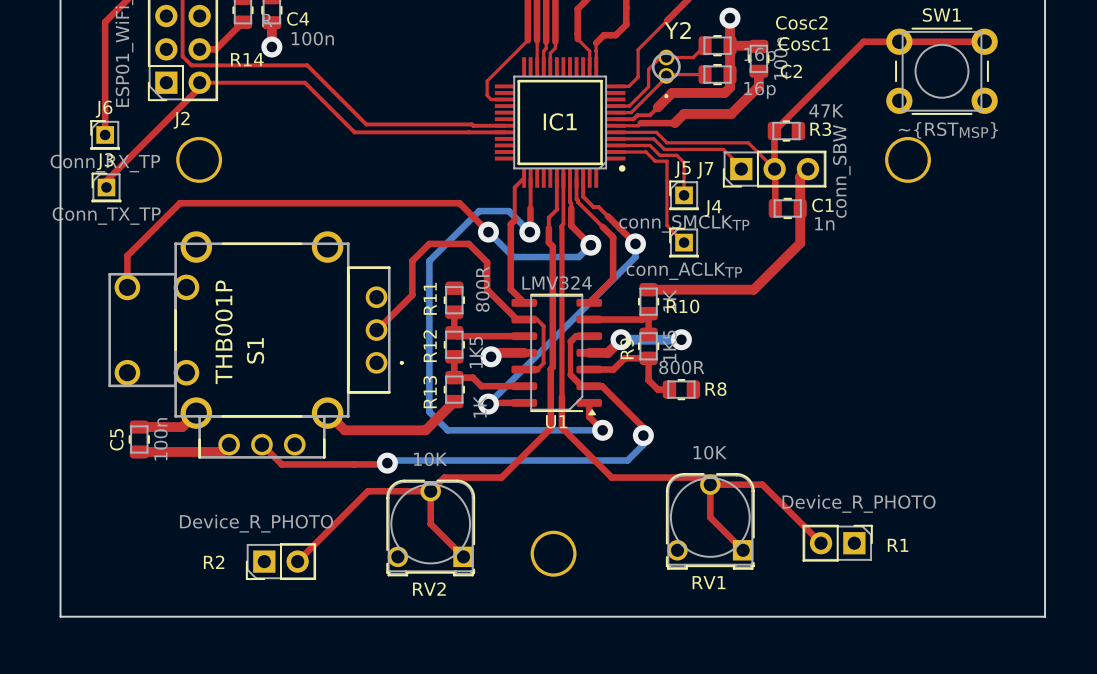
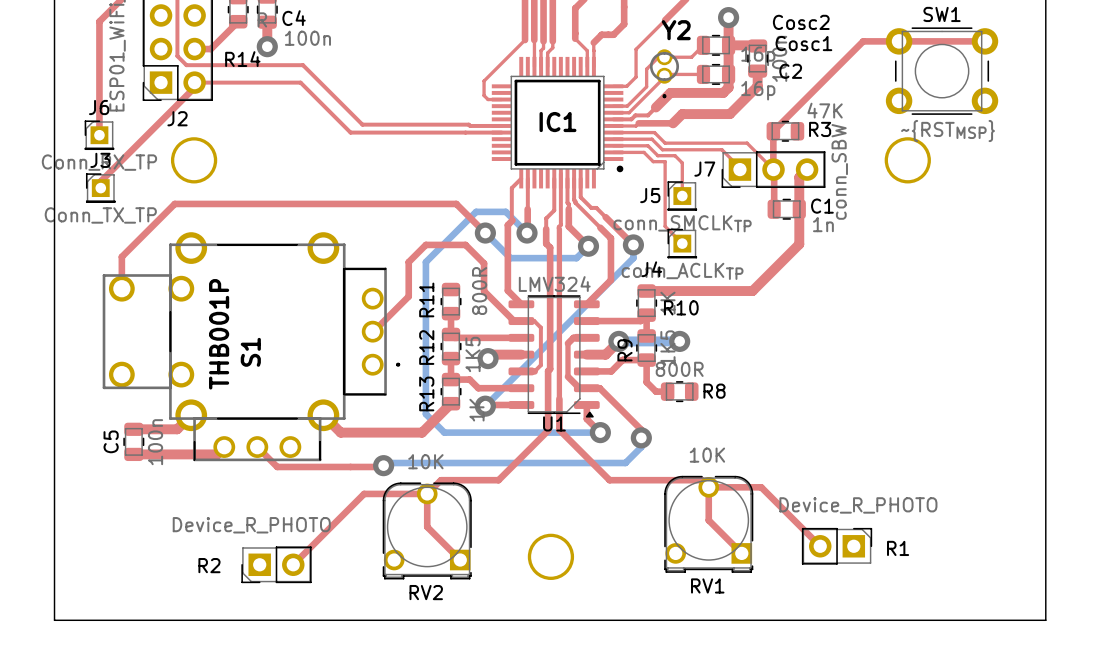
J5 name position: J5 (682, 169) -> J5 (650, 195)
J4 name position: J4 (713, 208) -> J4 (651, 269)

